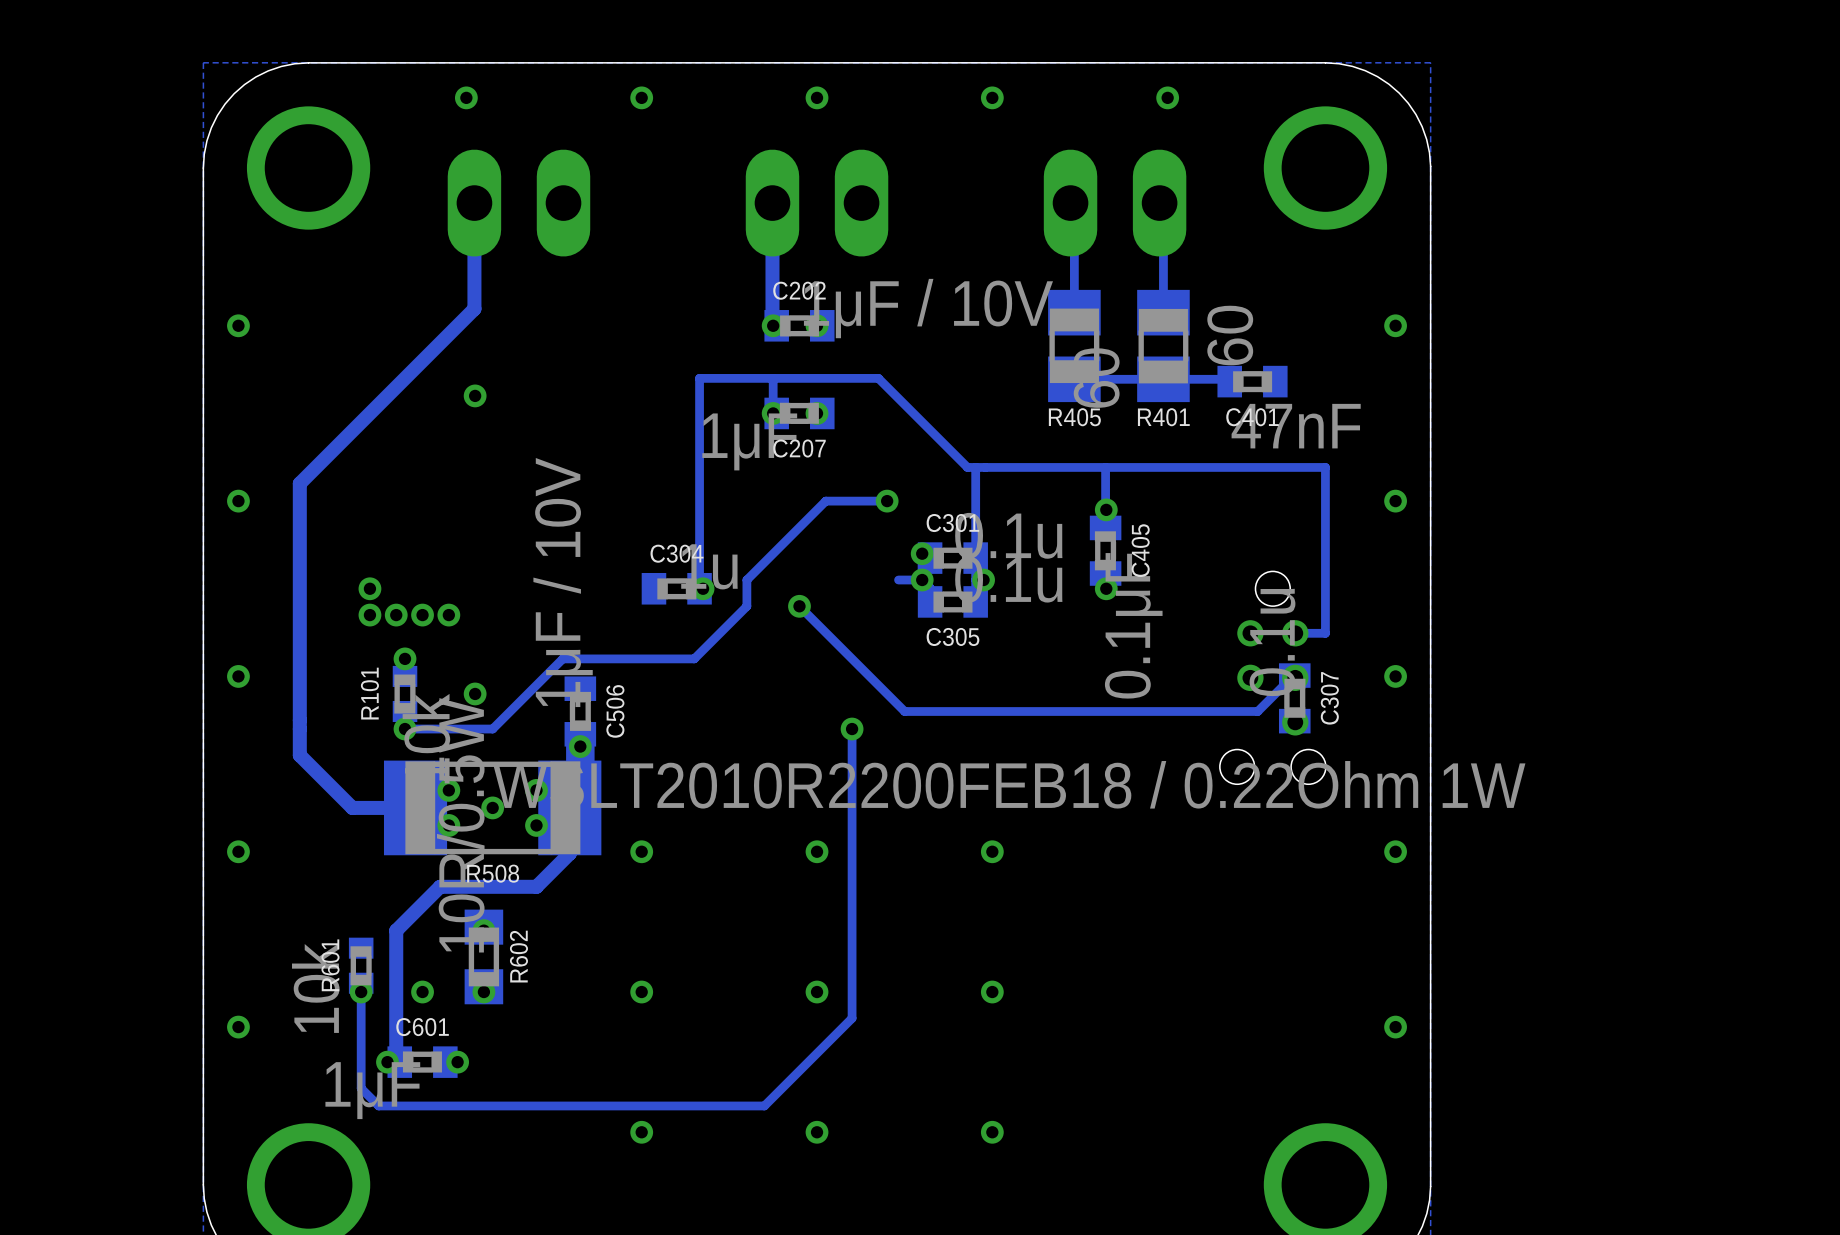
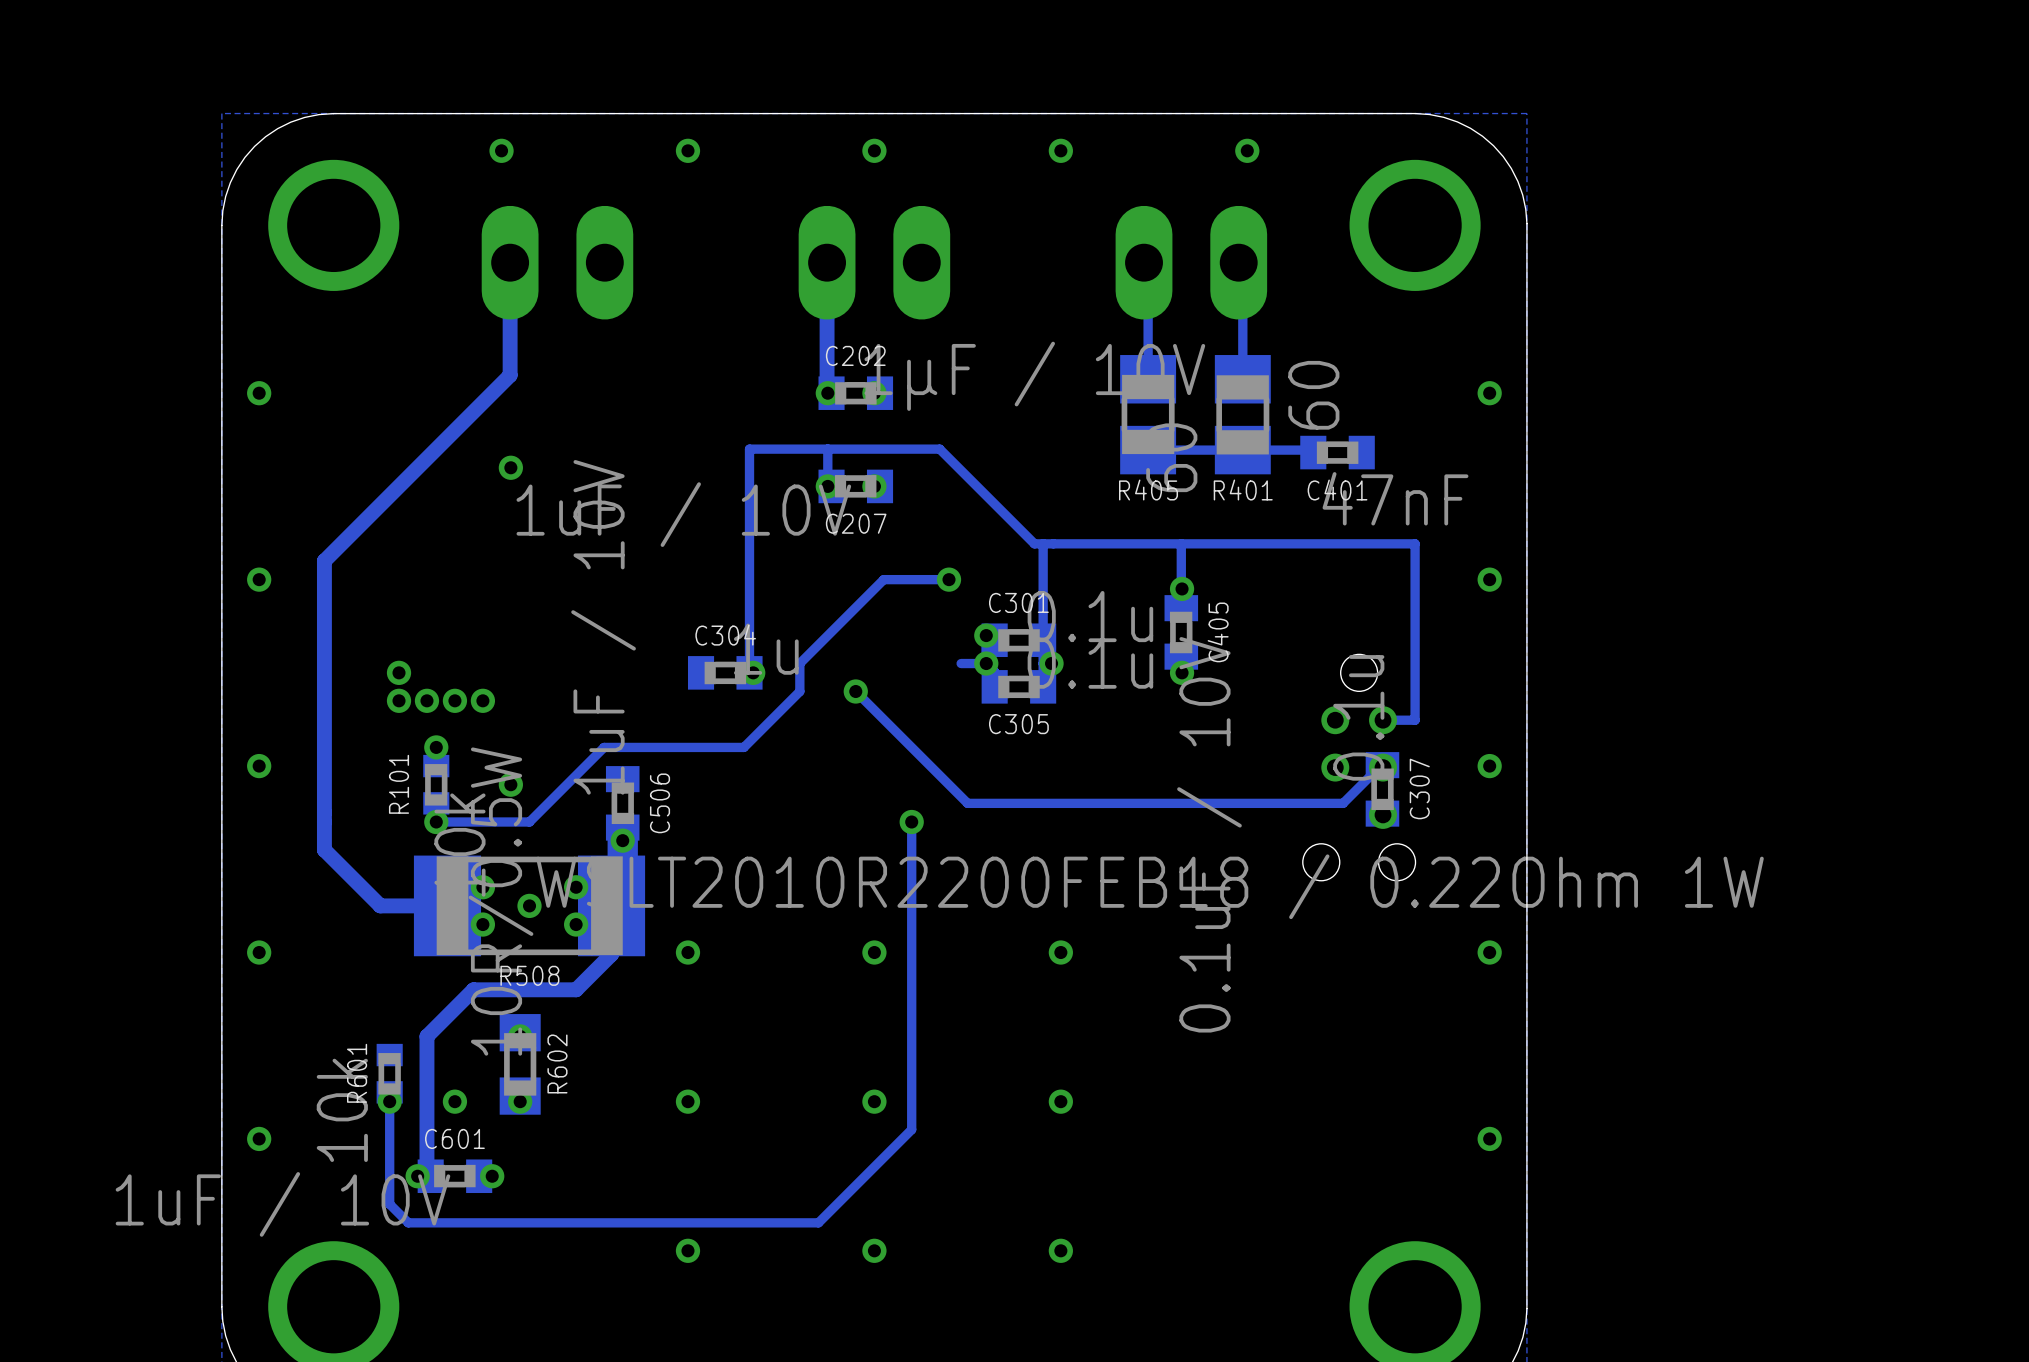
C207 value: 1μF (749, 441) -> 1uF / 10V (683, 514)
C506 value: 1μF / 10V (563, 582) -> 1uF / 10V (603, 627)
C405 value: 0.1μF (1133, 625) -> 0.1uF / 10V (1209, 834)
C601 value: 1μF (372, 1090) -> 1uF / 10V (282, 1204)

